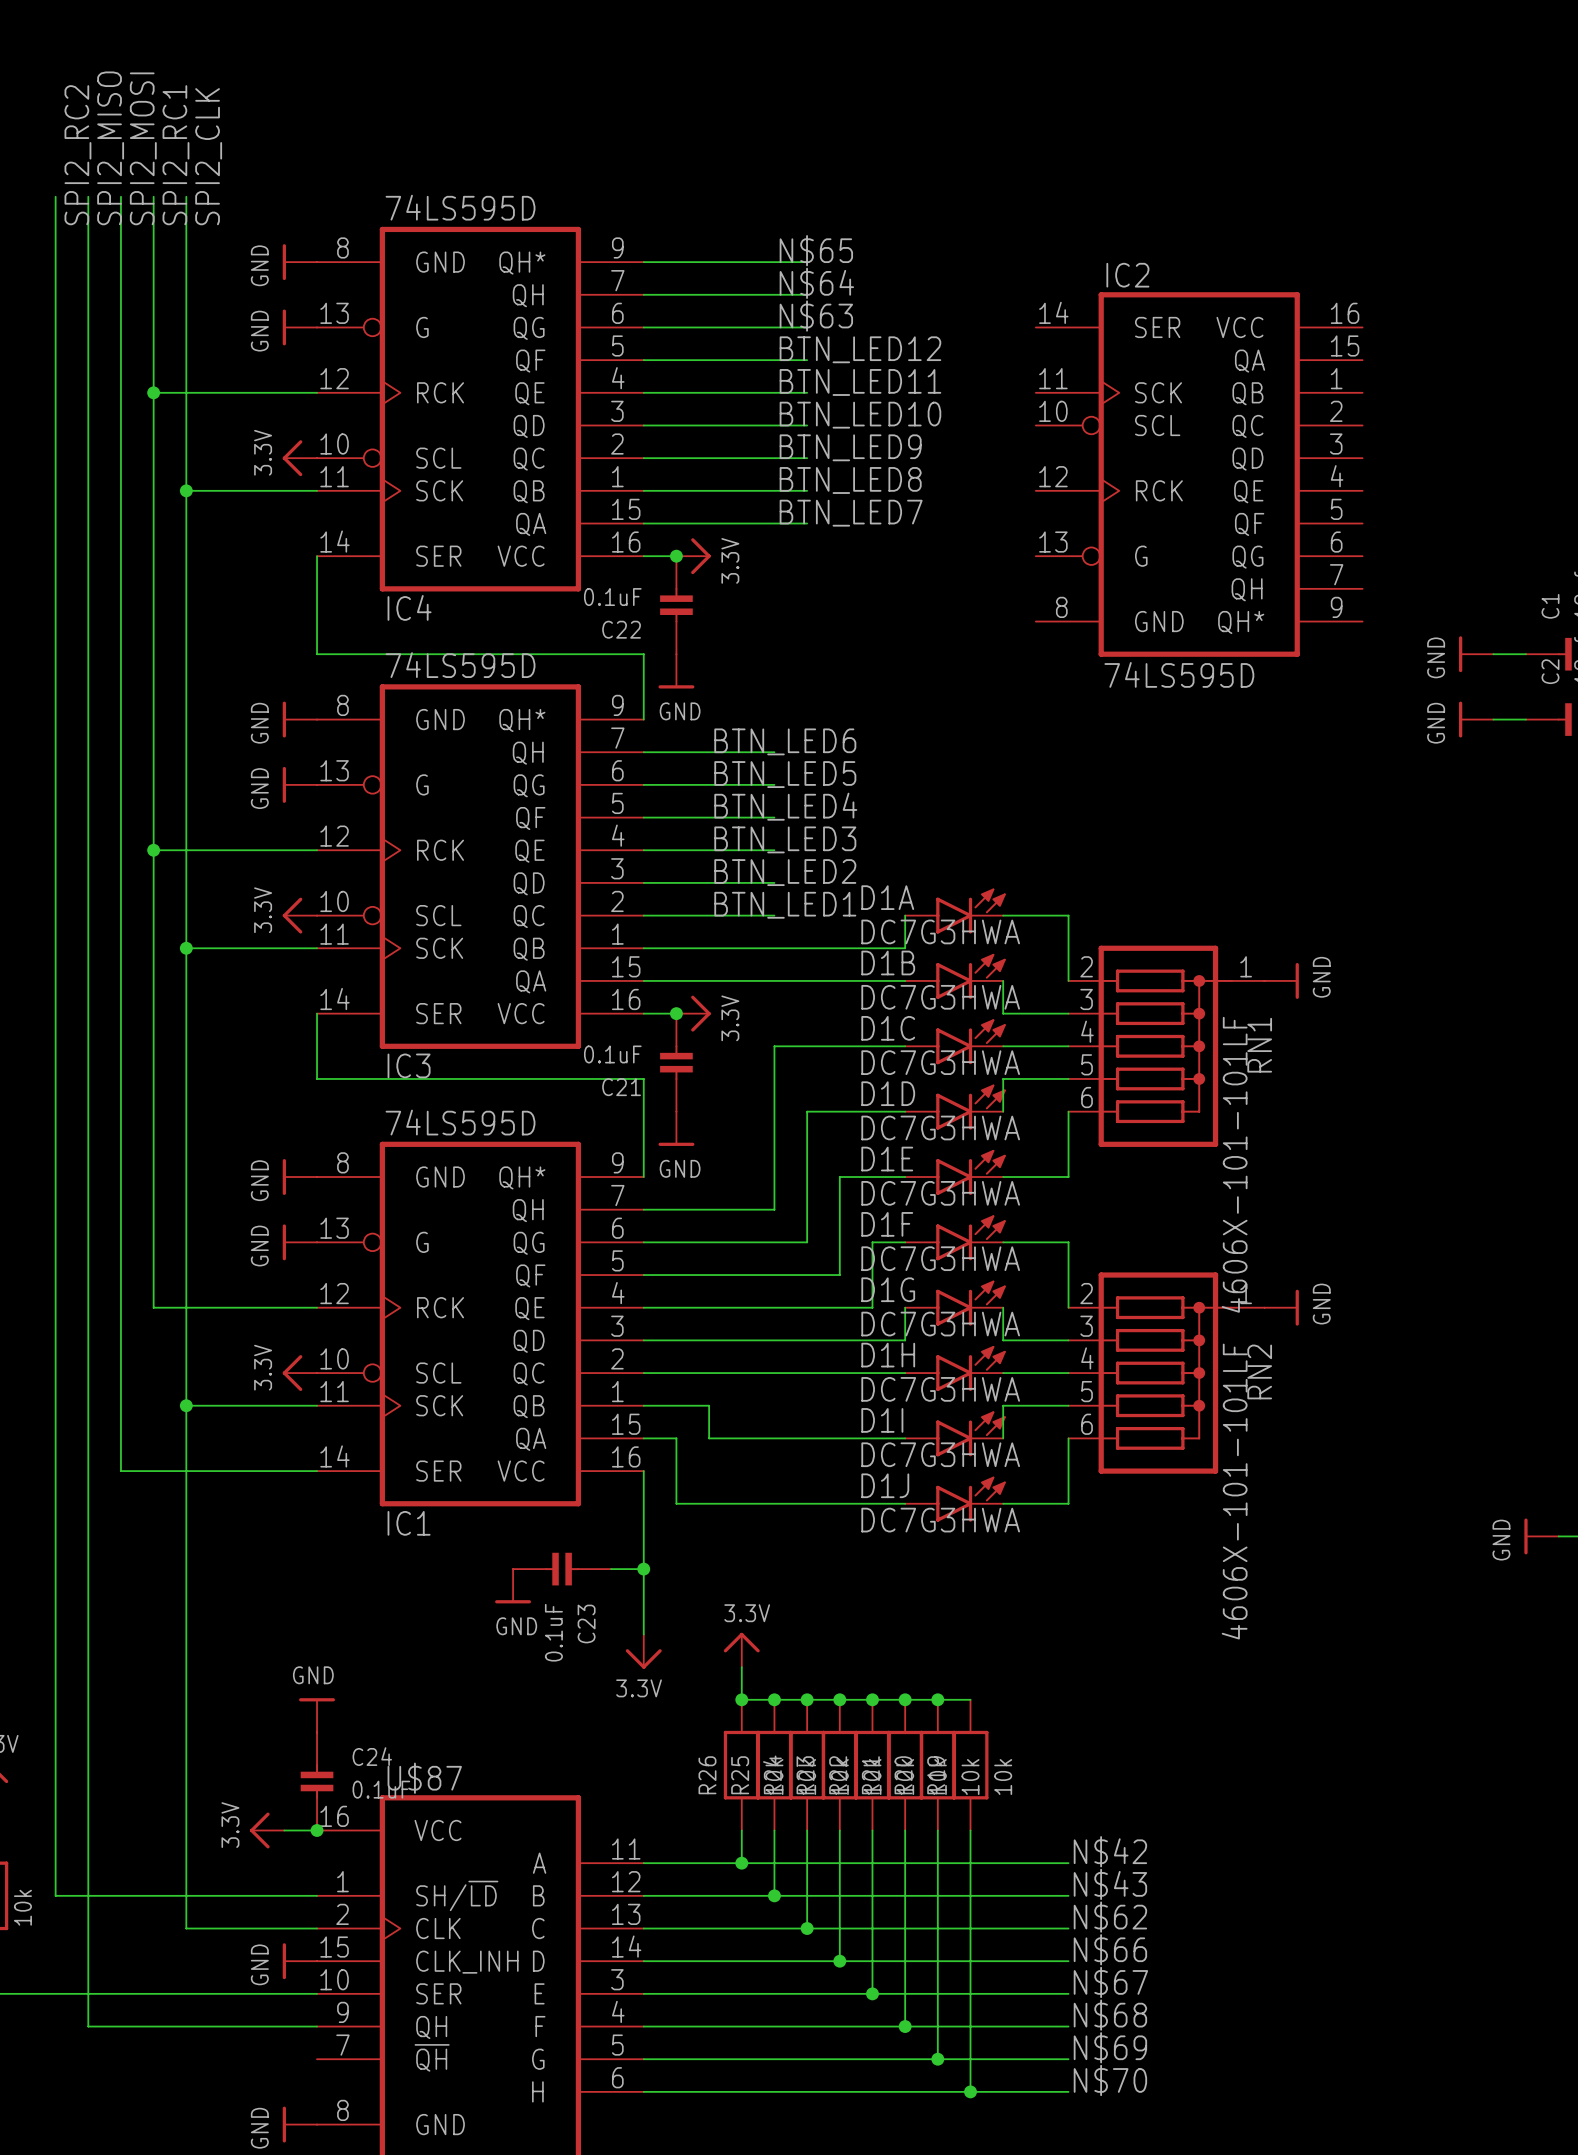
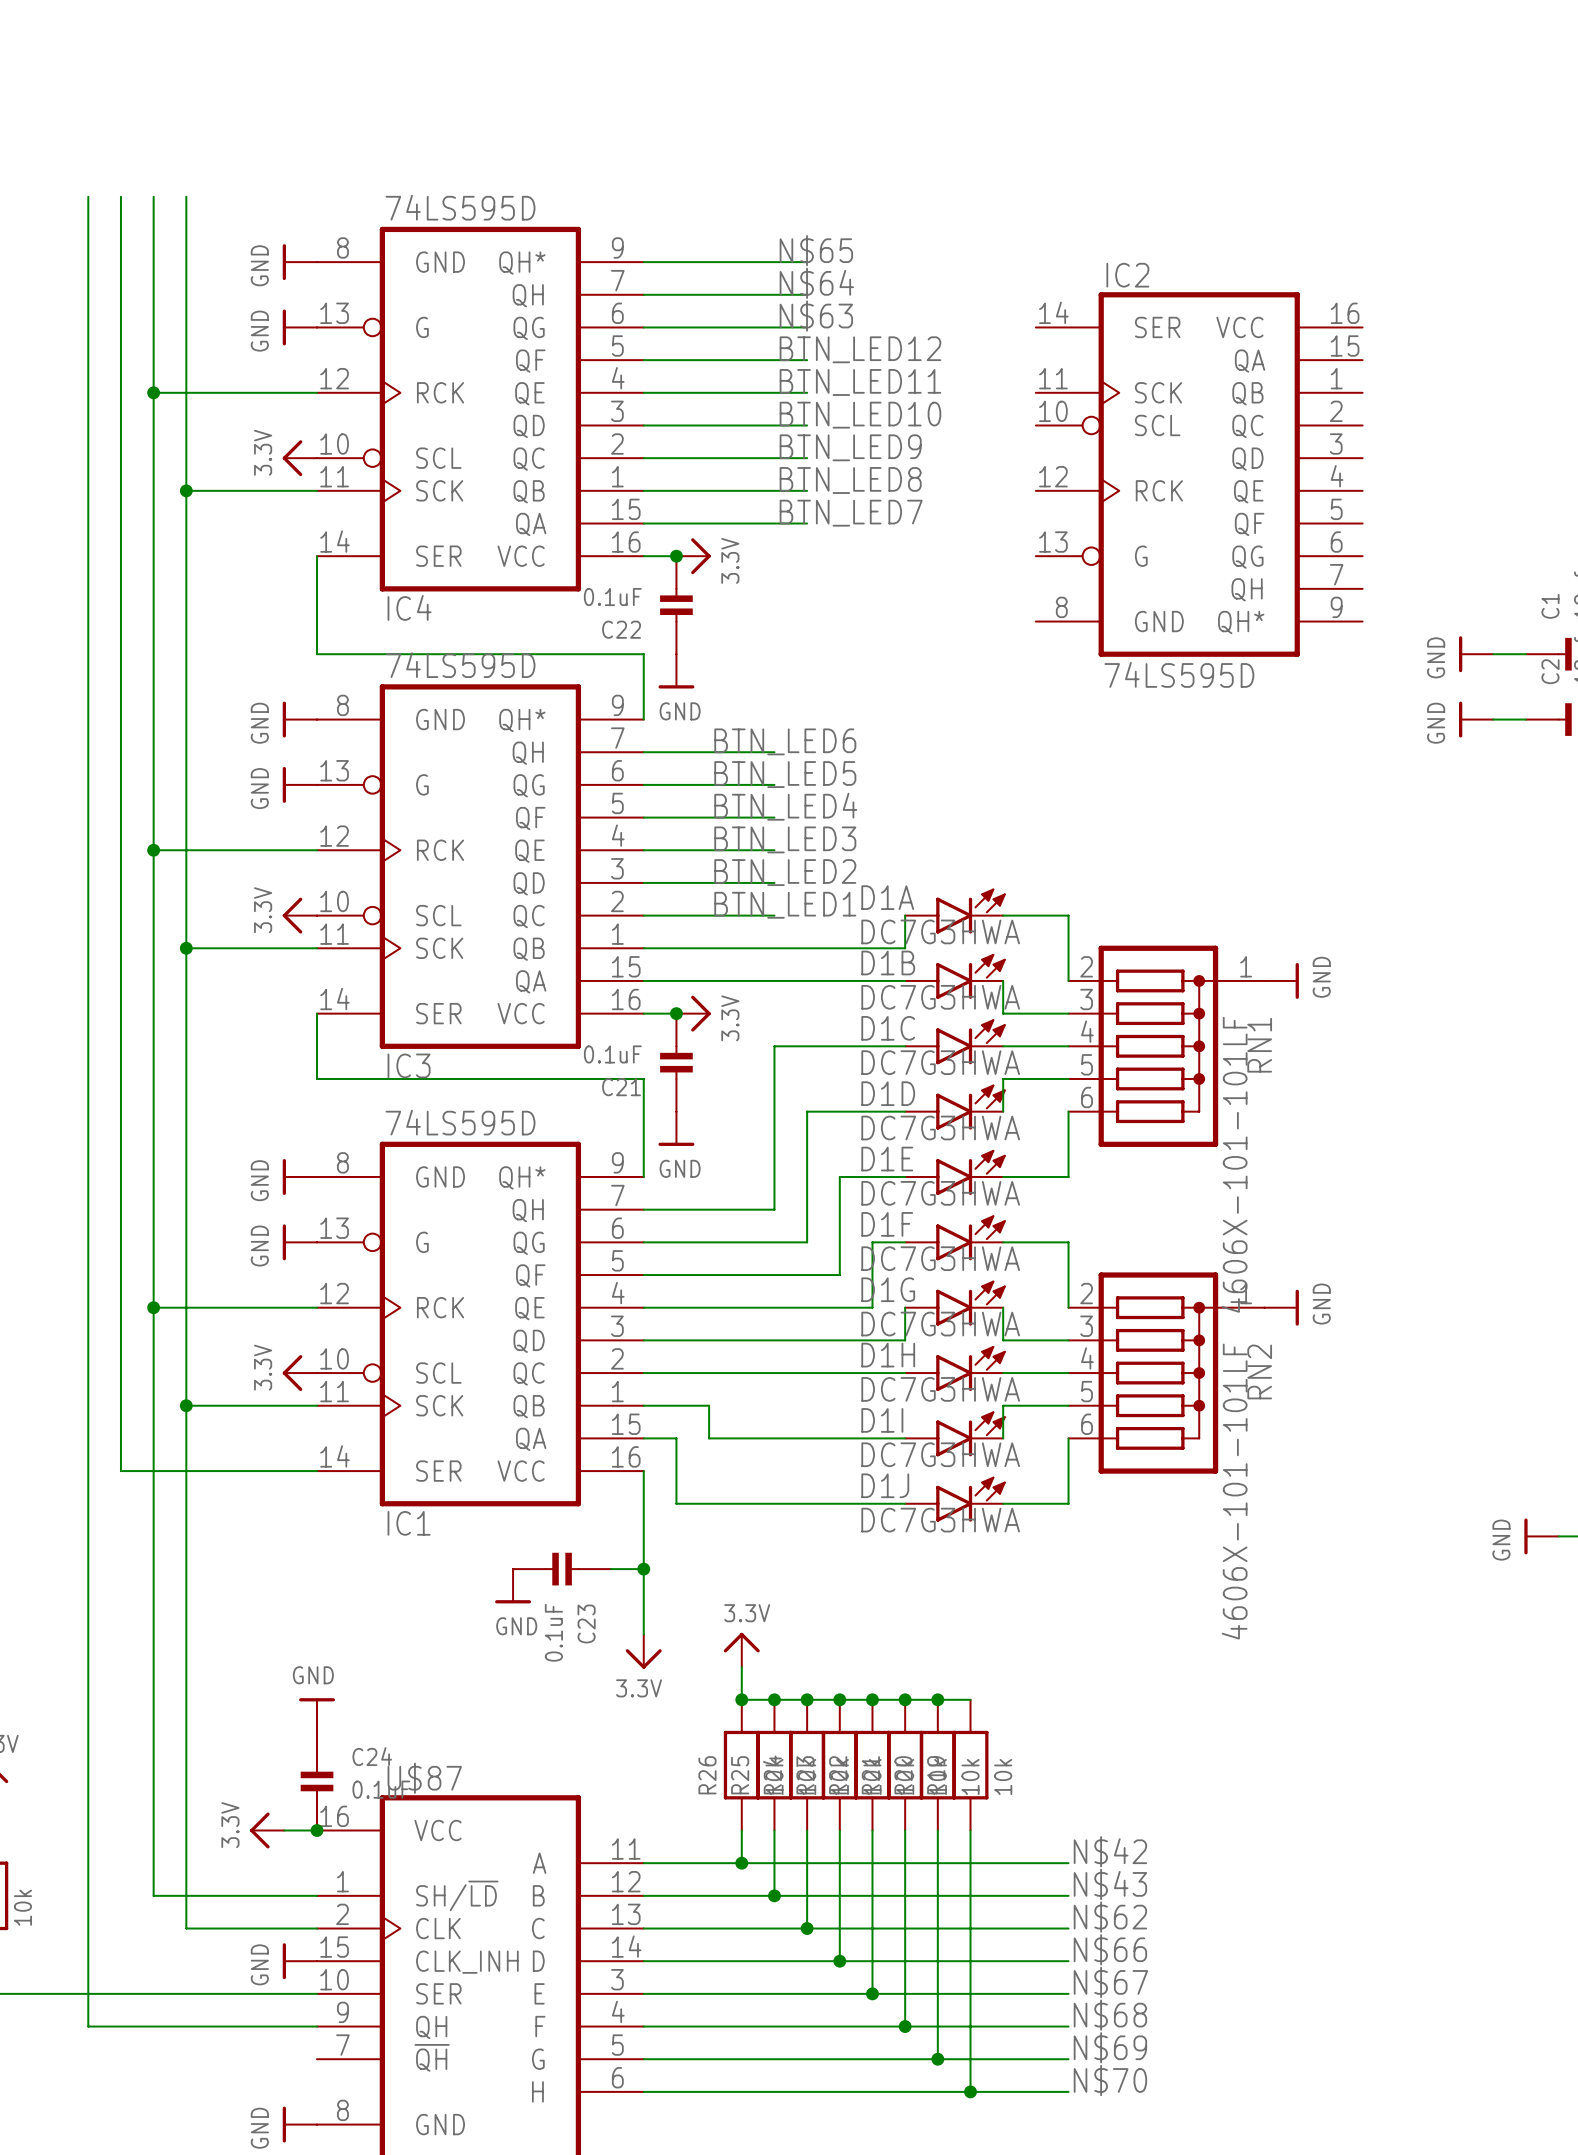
label: SPI2_MISO (110, 148) -> none
label: SPI2_MOSI (143, 148) -> none
label: SPI2_RC2 (77, 155) -> none
label: SPI2_RC1 (175, 155) -> none
label: SPI2_CLK (208, 156) -> none
wire: (55, 196) (55, 1895) (153, 1895) -> (153, 1307) (153, 1895)
junction: none -> (153, 1307)

